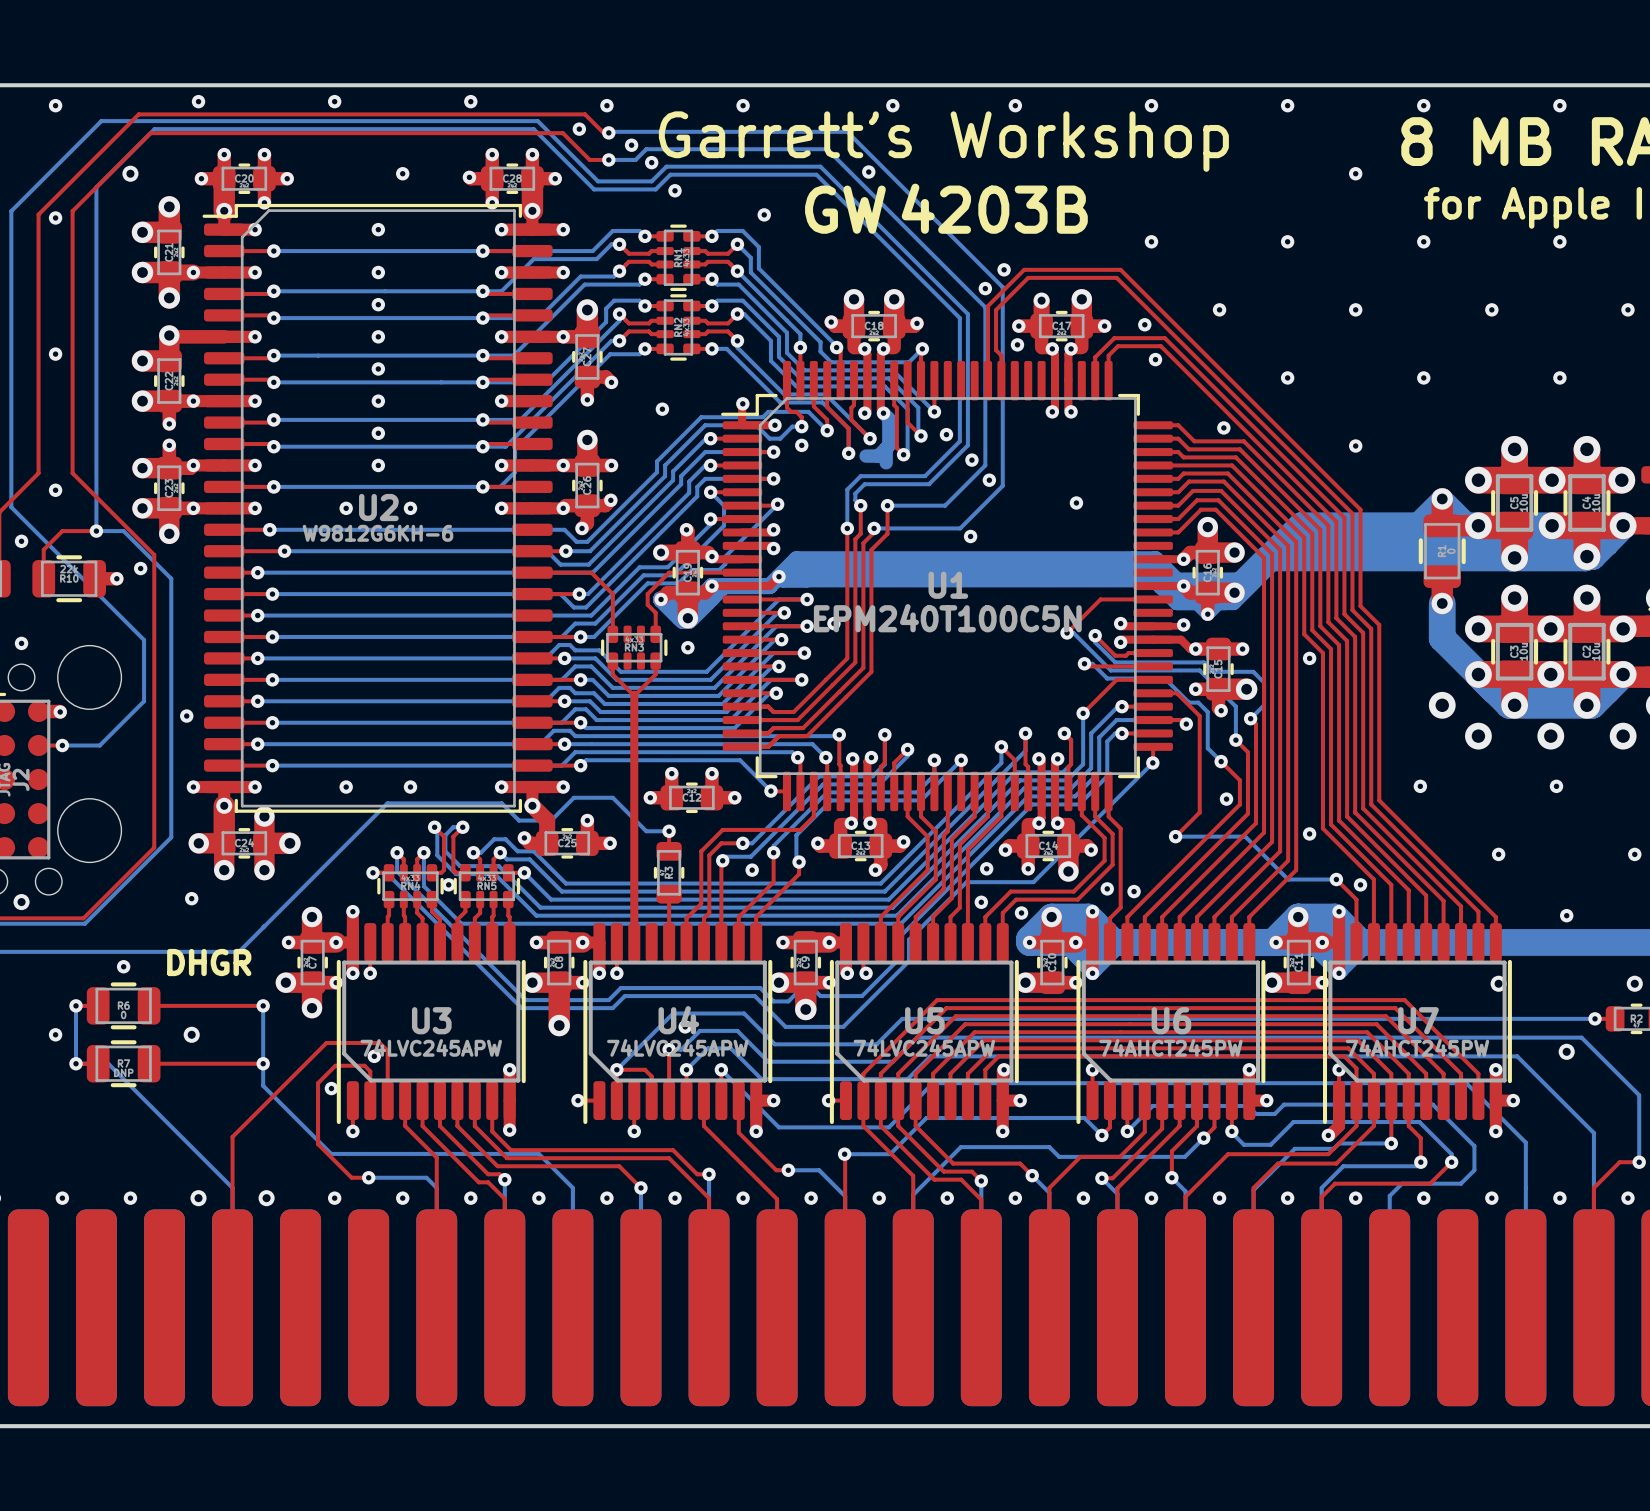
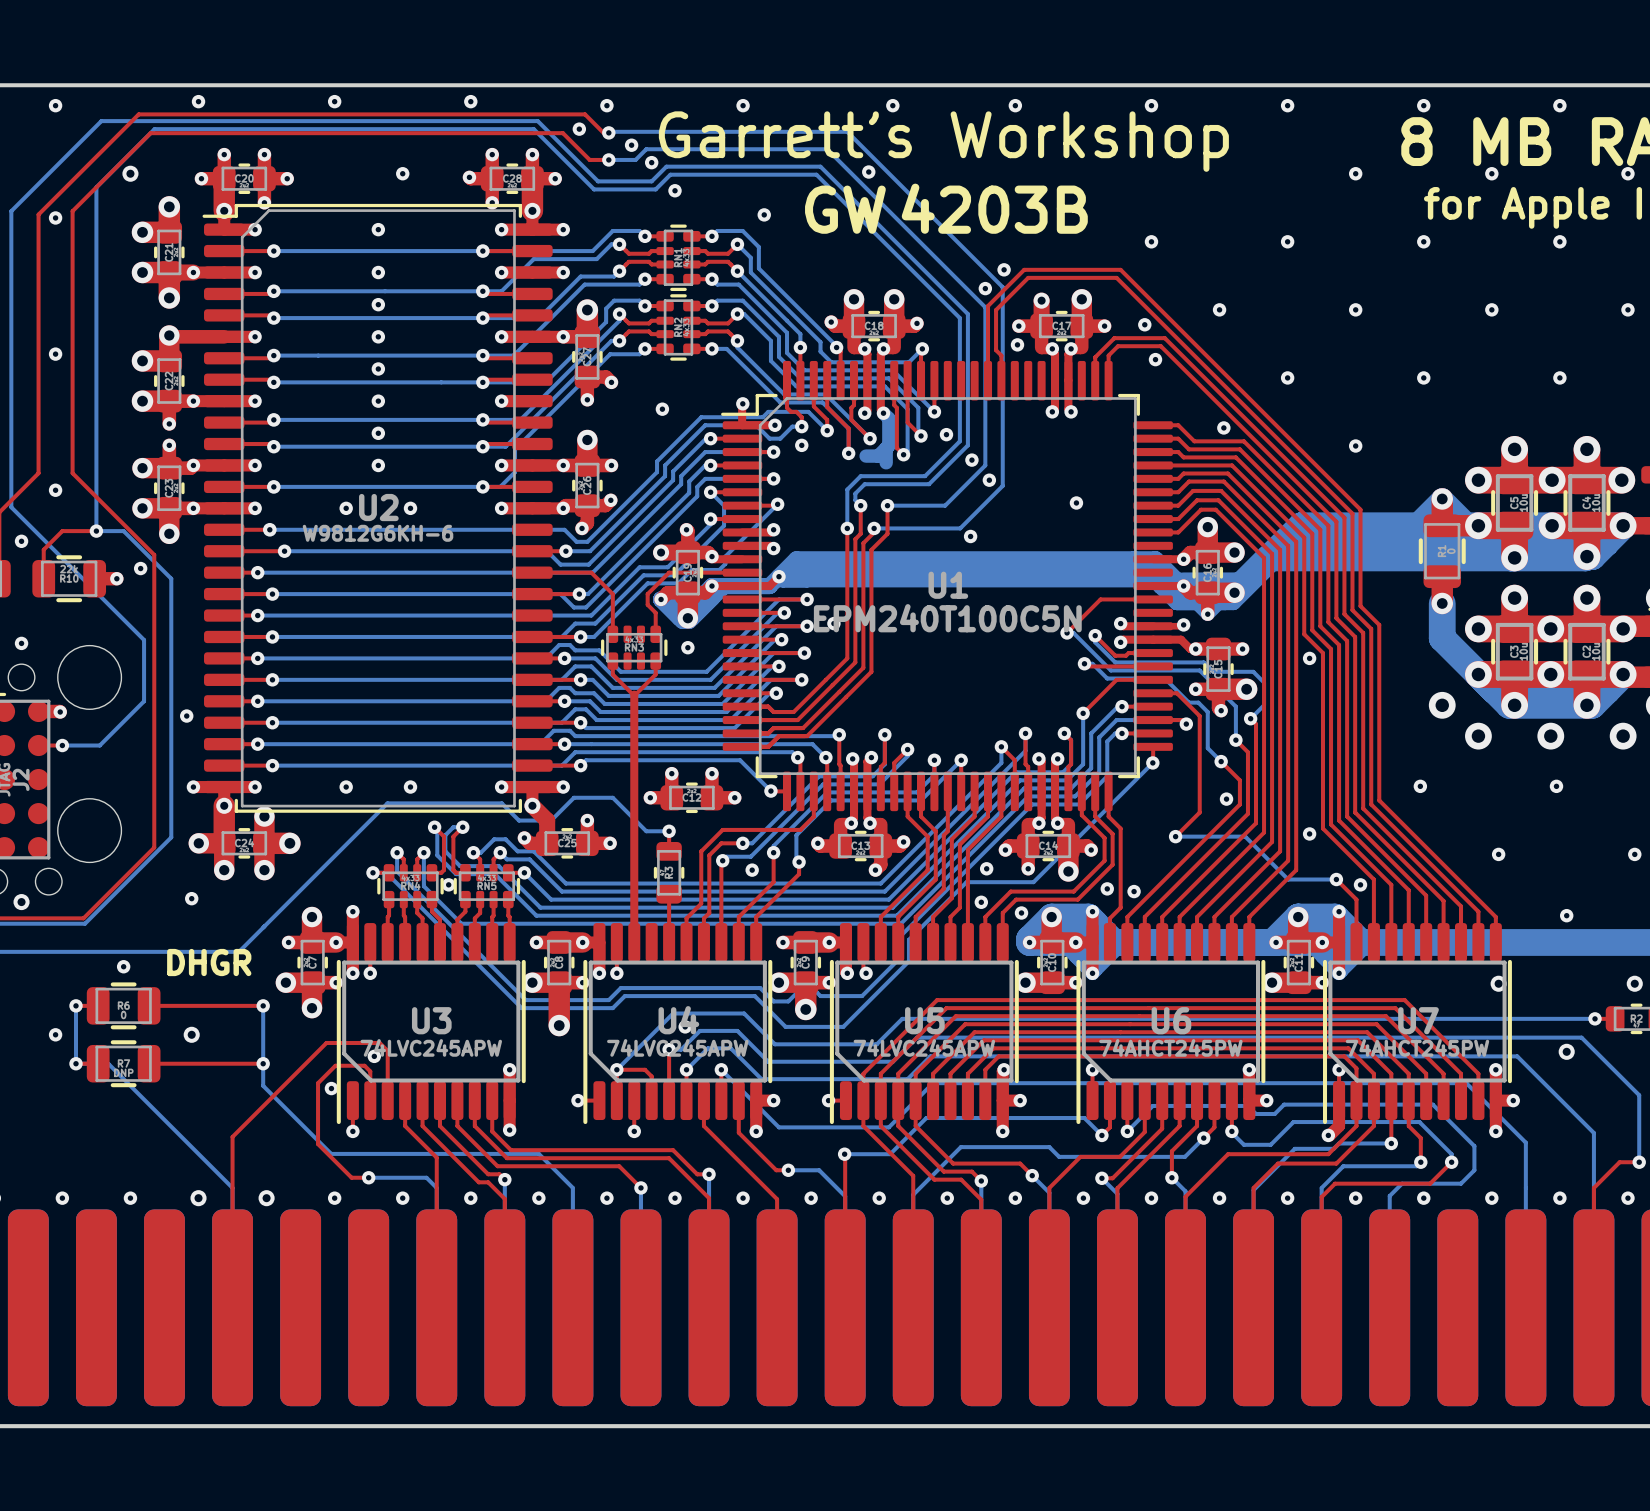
via: none -> (1491, 173)
via: none -> (1627, 173)

